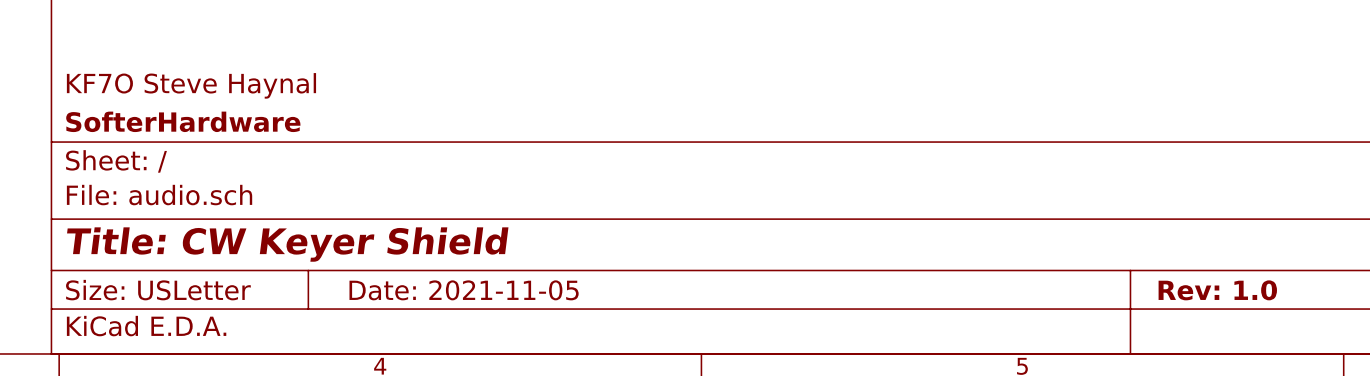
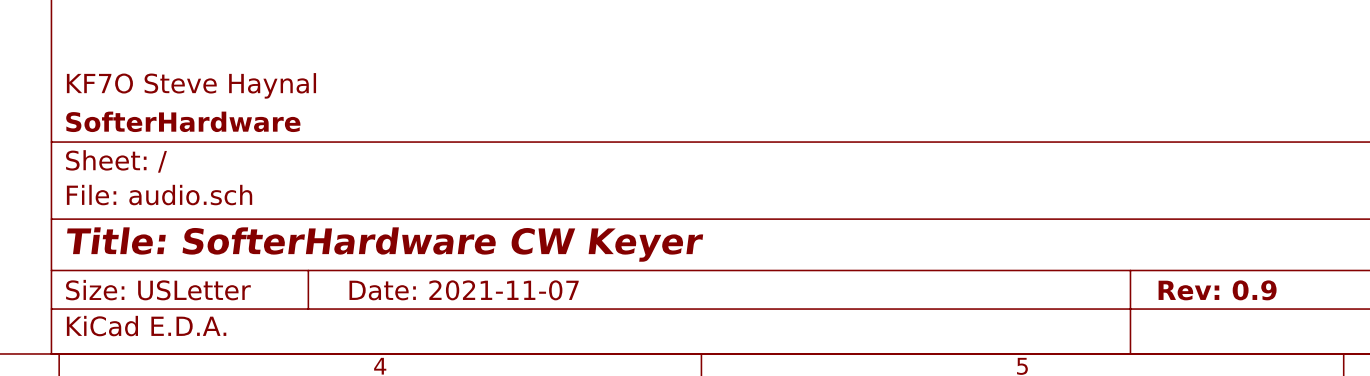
title block: Title: CW Keyer Shield (287, 244) -> Title: SofterHardware CW Keyer (385, 244)
title block: Date: 2021-11-05 (464, 290) -> Date: 2021-11-07 (464, 290)
title block: Rev: 1.0 (1217, 290) -> Rev: 0.9 (1217, 290)

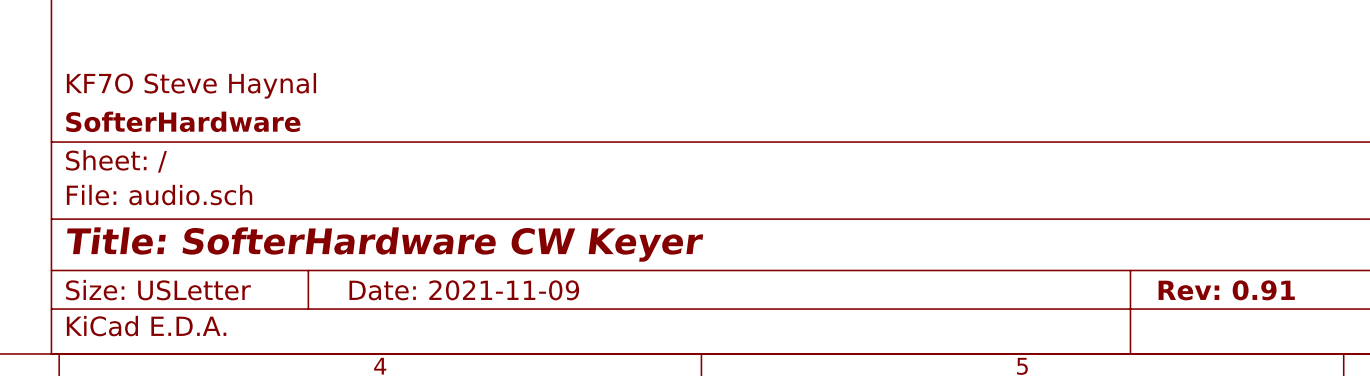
title block: Date: 2021-11-07 (464, 290) -> Date: 2021-11-09 (464, 290)
title block: Rev: 0.9 (1217, 290) -> Rev: 0.91 (1226, 290)

